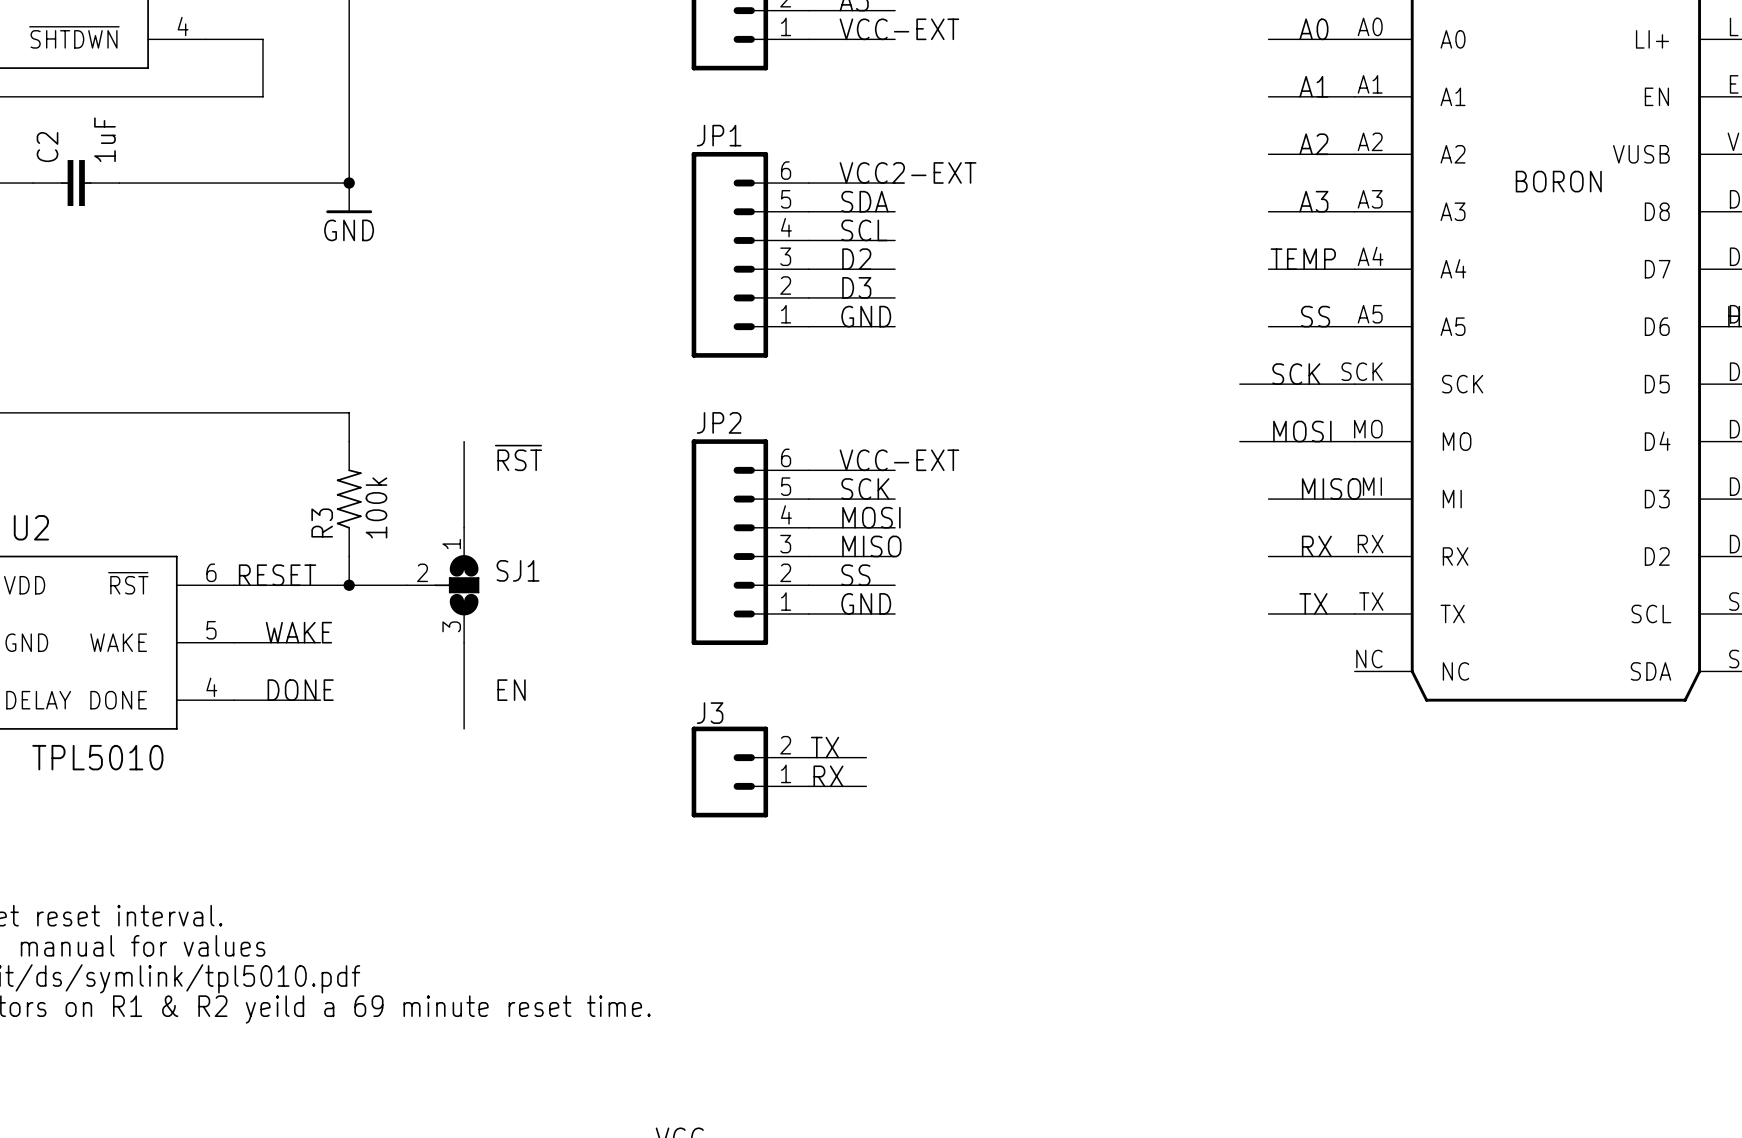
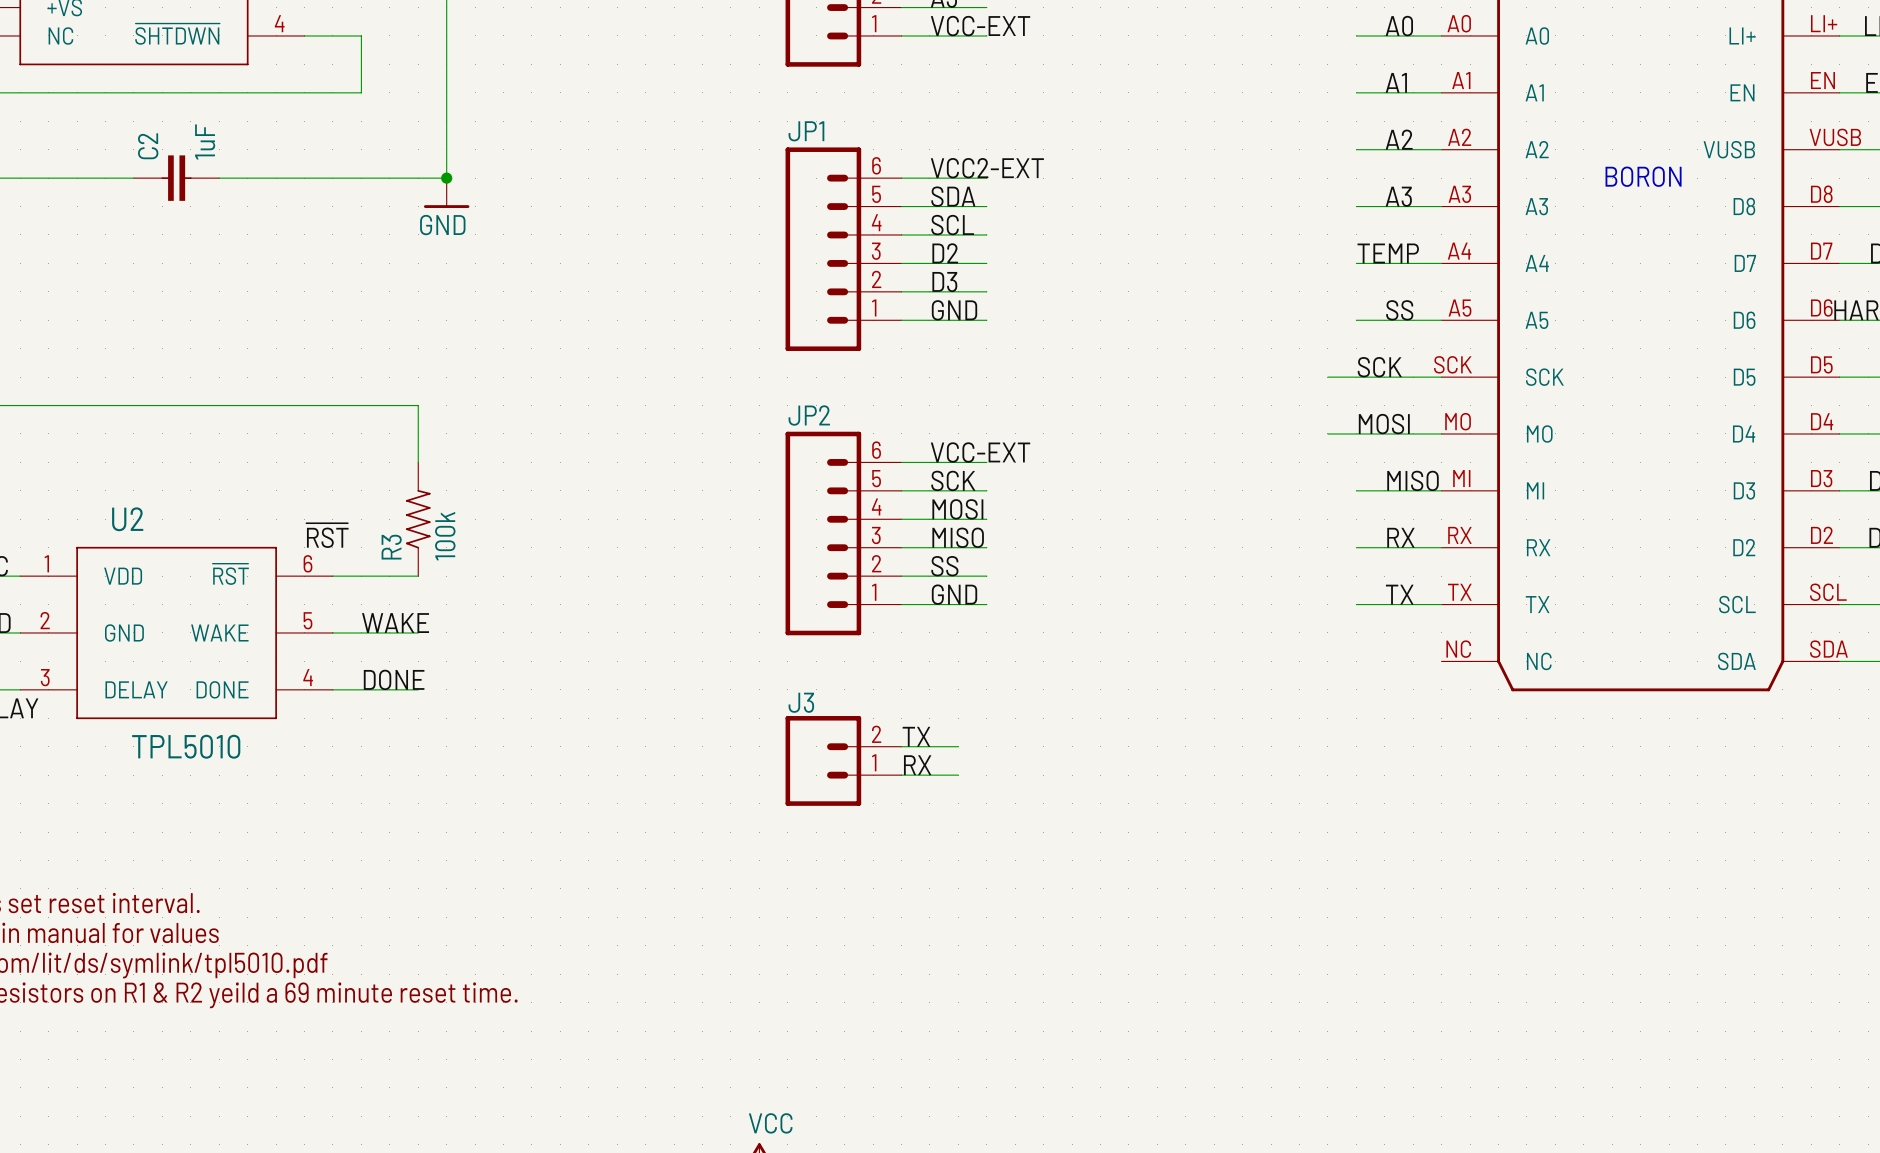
wire: (320, 412) (349, 412) (349, 441) -> (418, 405) (418, 462)
wire: (464, 441) (464, 527) -> none
label: ~{RST} (518, 457) -> none
R3 position: (349, 499) -> (418, 519)
label: none -> ~{RST} (327, 535)
wire: (349, 556) (349, 585) -> none
label: RESET (277, 575) -> none
wire: (320, 585) (406, 585) -> none
junction: (349, 585) -> none
SJ1: (442, 585) -> none
wire: (464, 642) (464, 728) -> none
label: EN (511, 690) -> none

